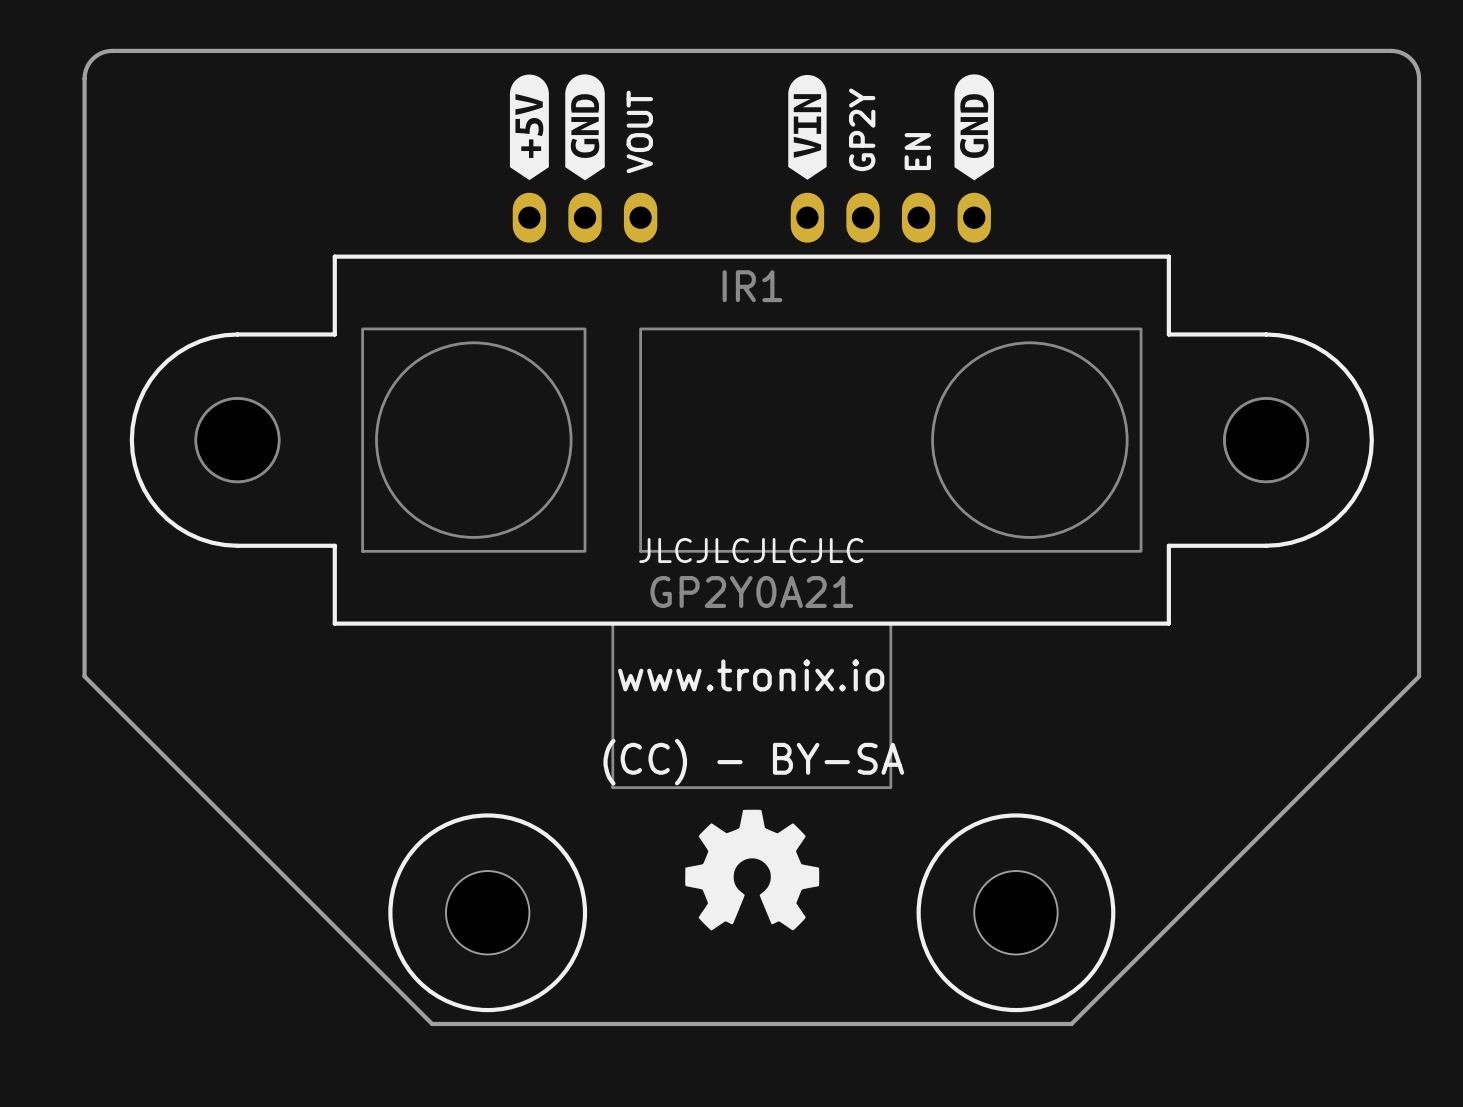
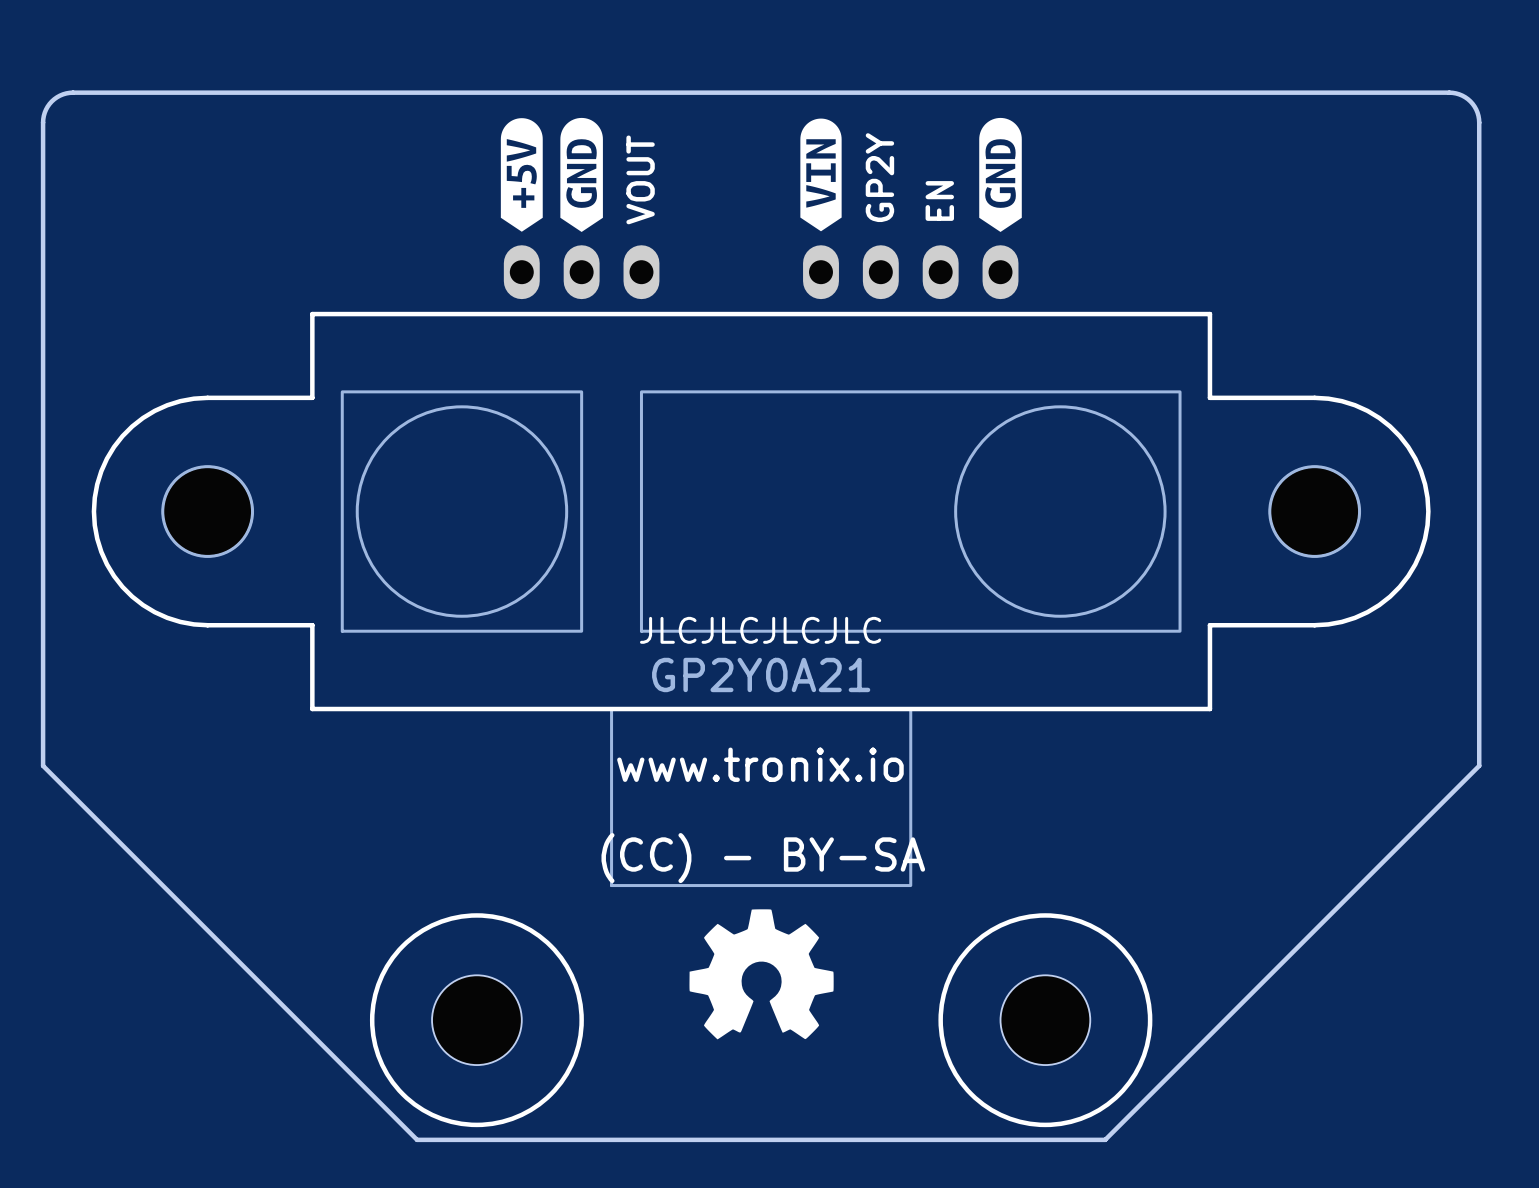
IR1 name: IR1 (752, 286) -> none

